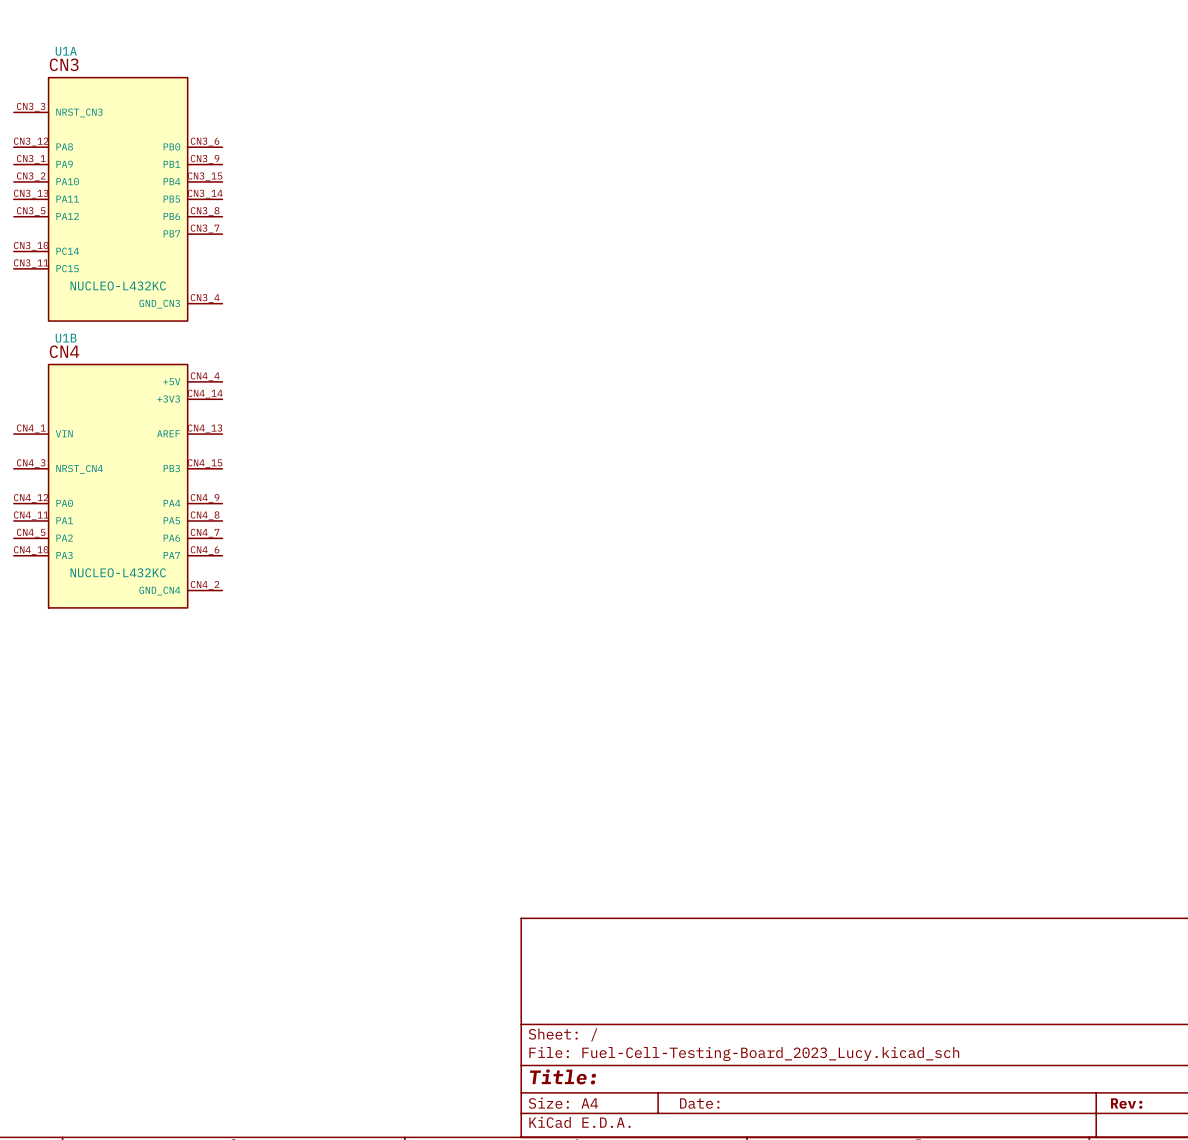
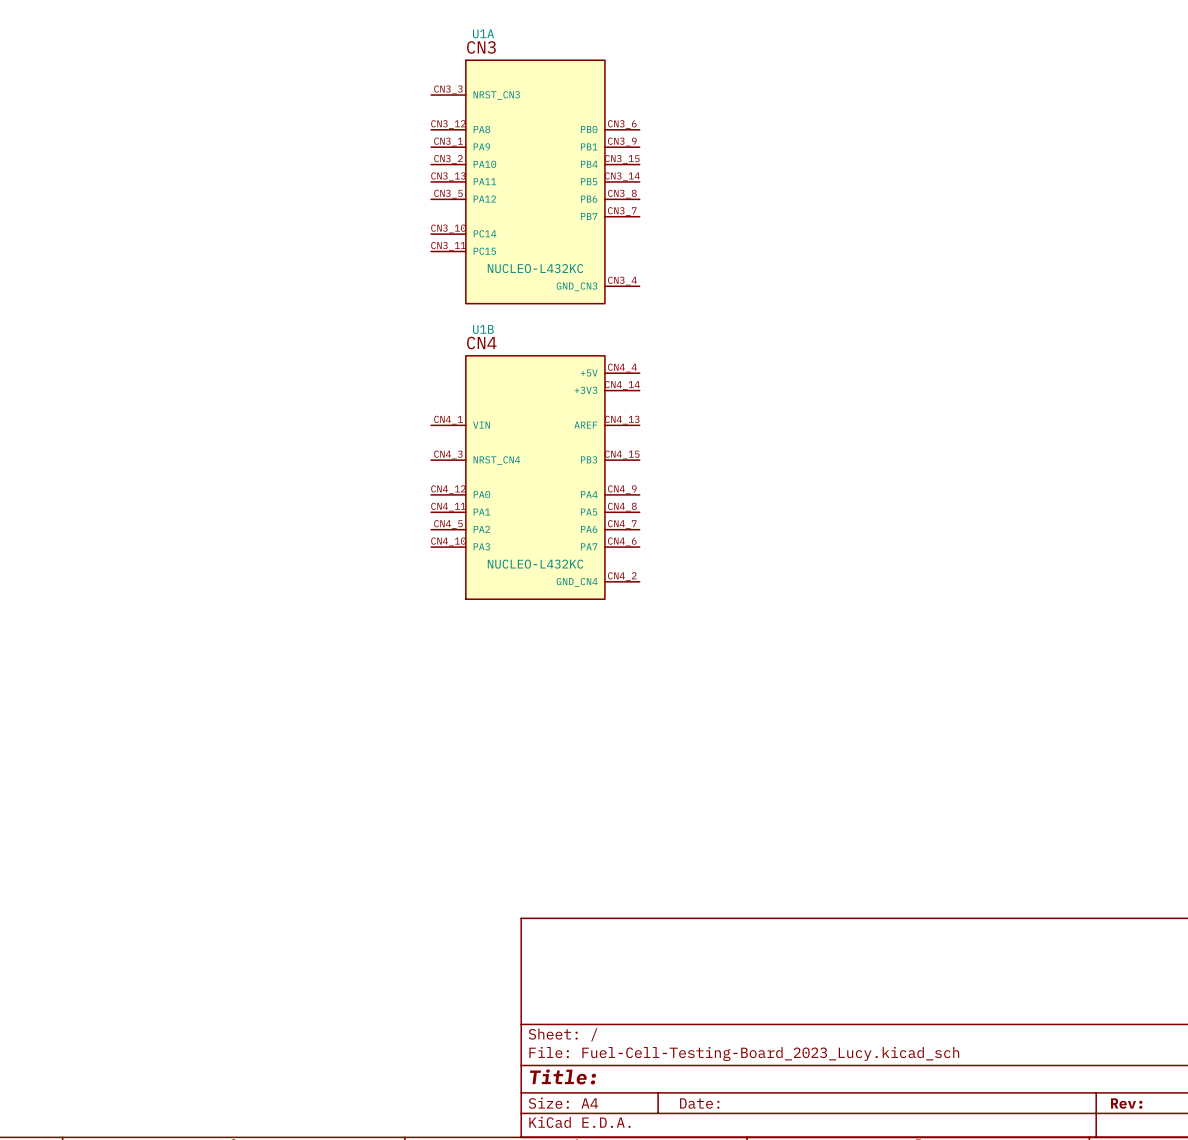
U1A position: (118, 199) -> (535, 181)
U1B position: (118, 486) -> (535, 477)

